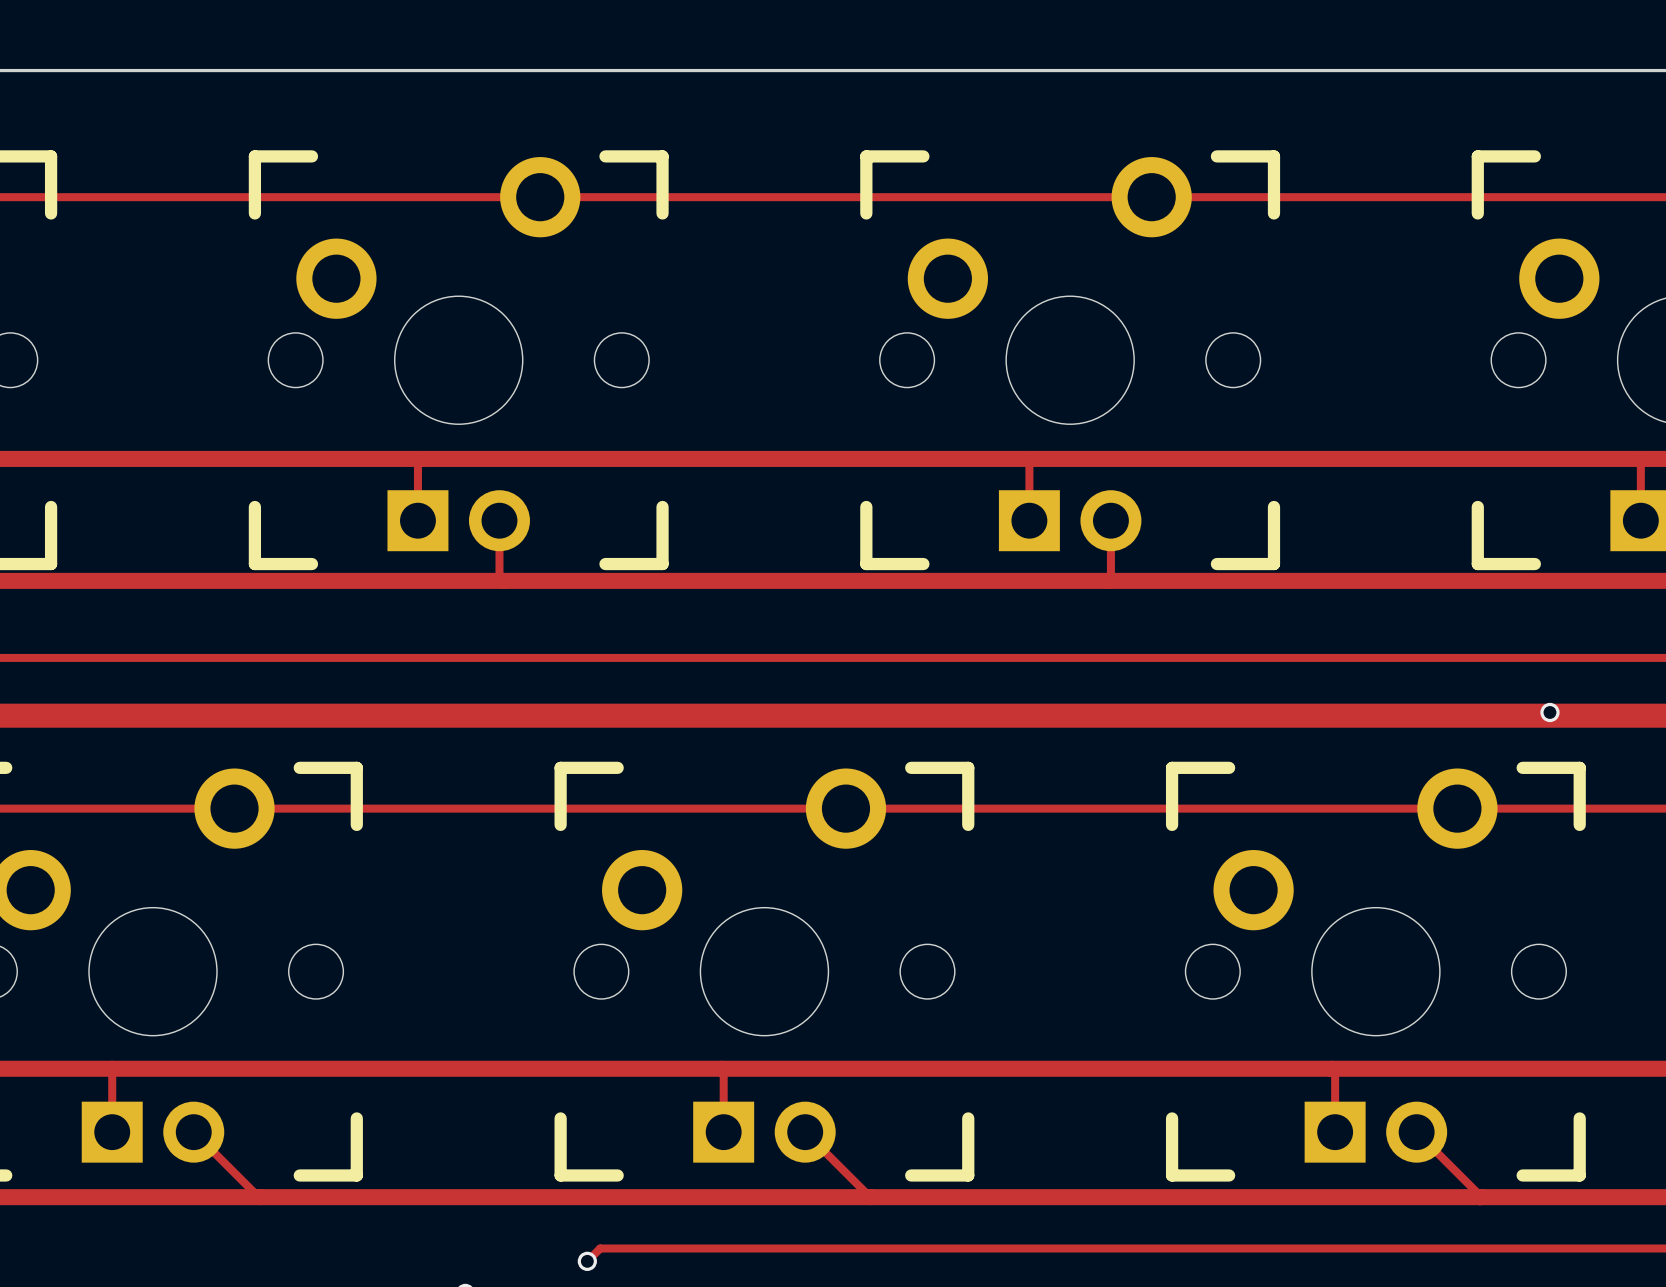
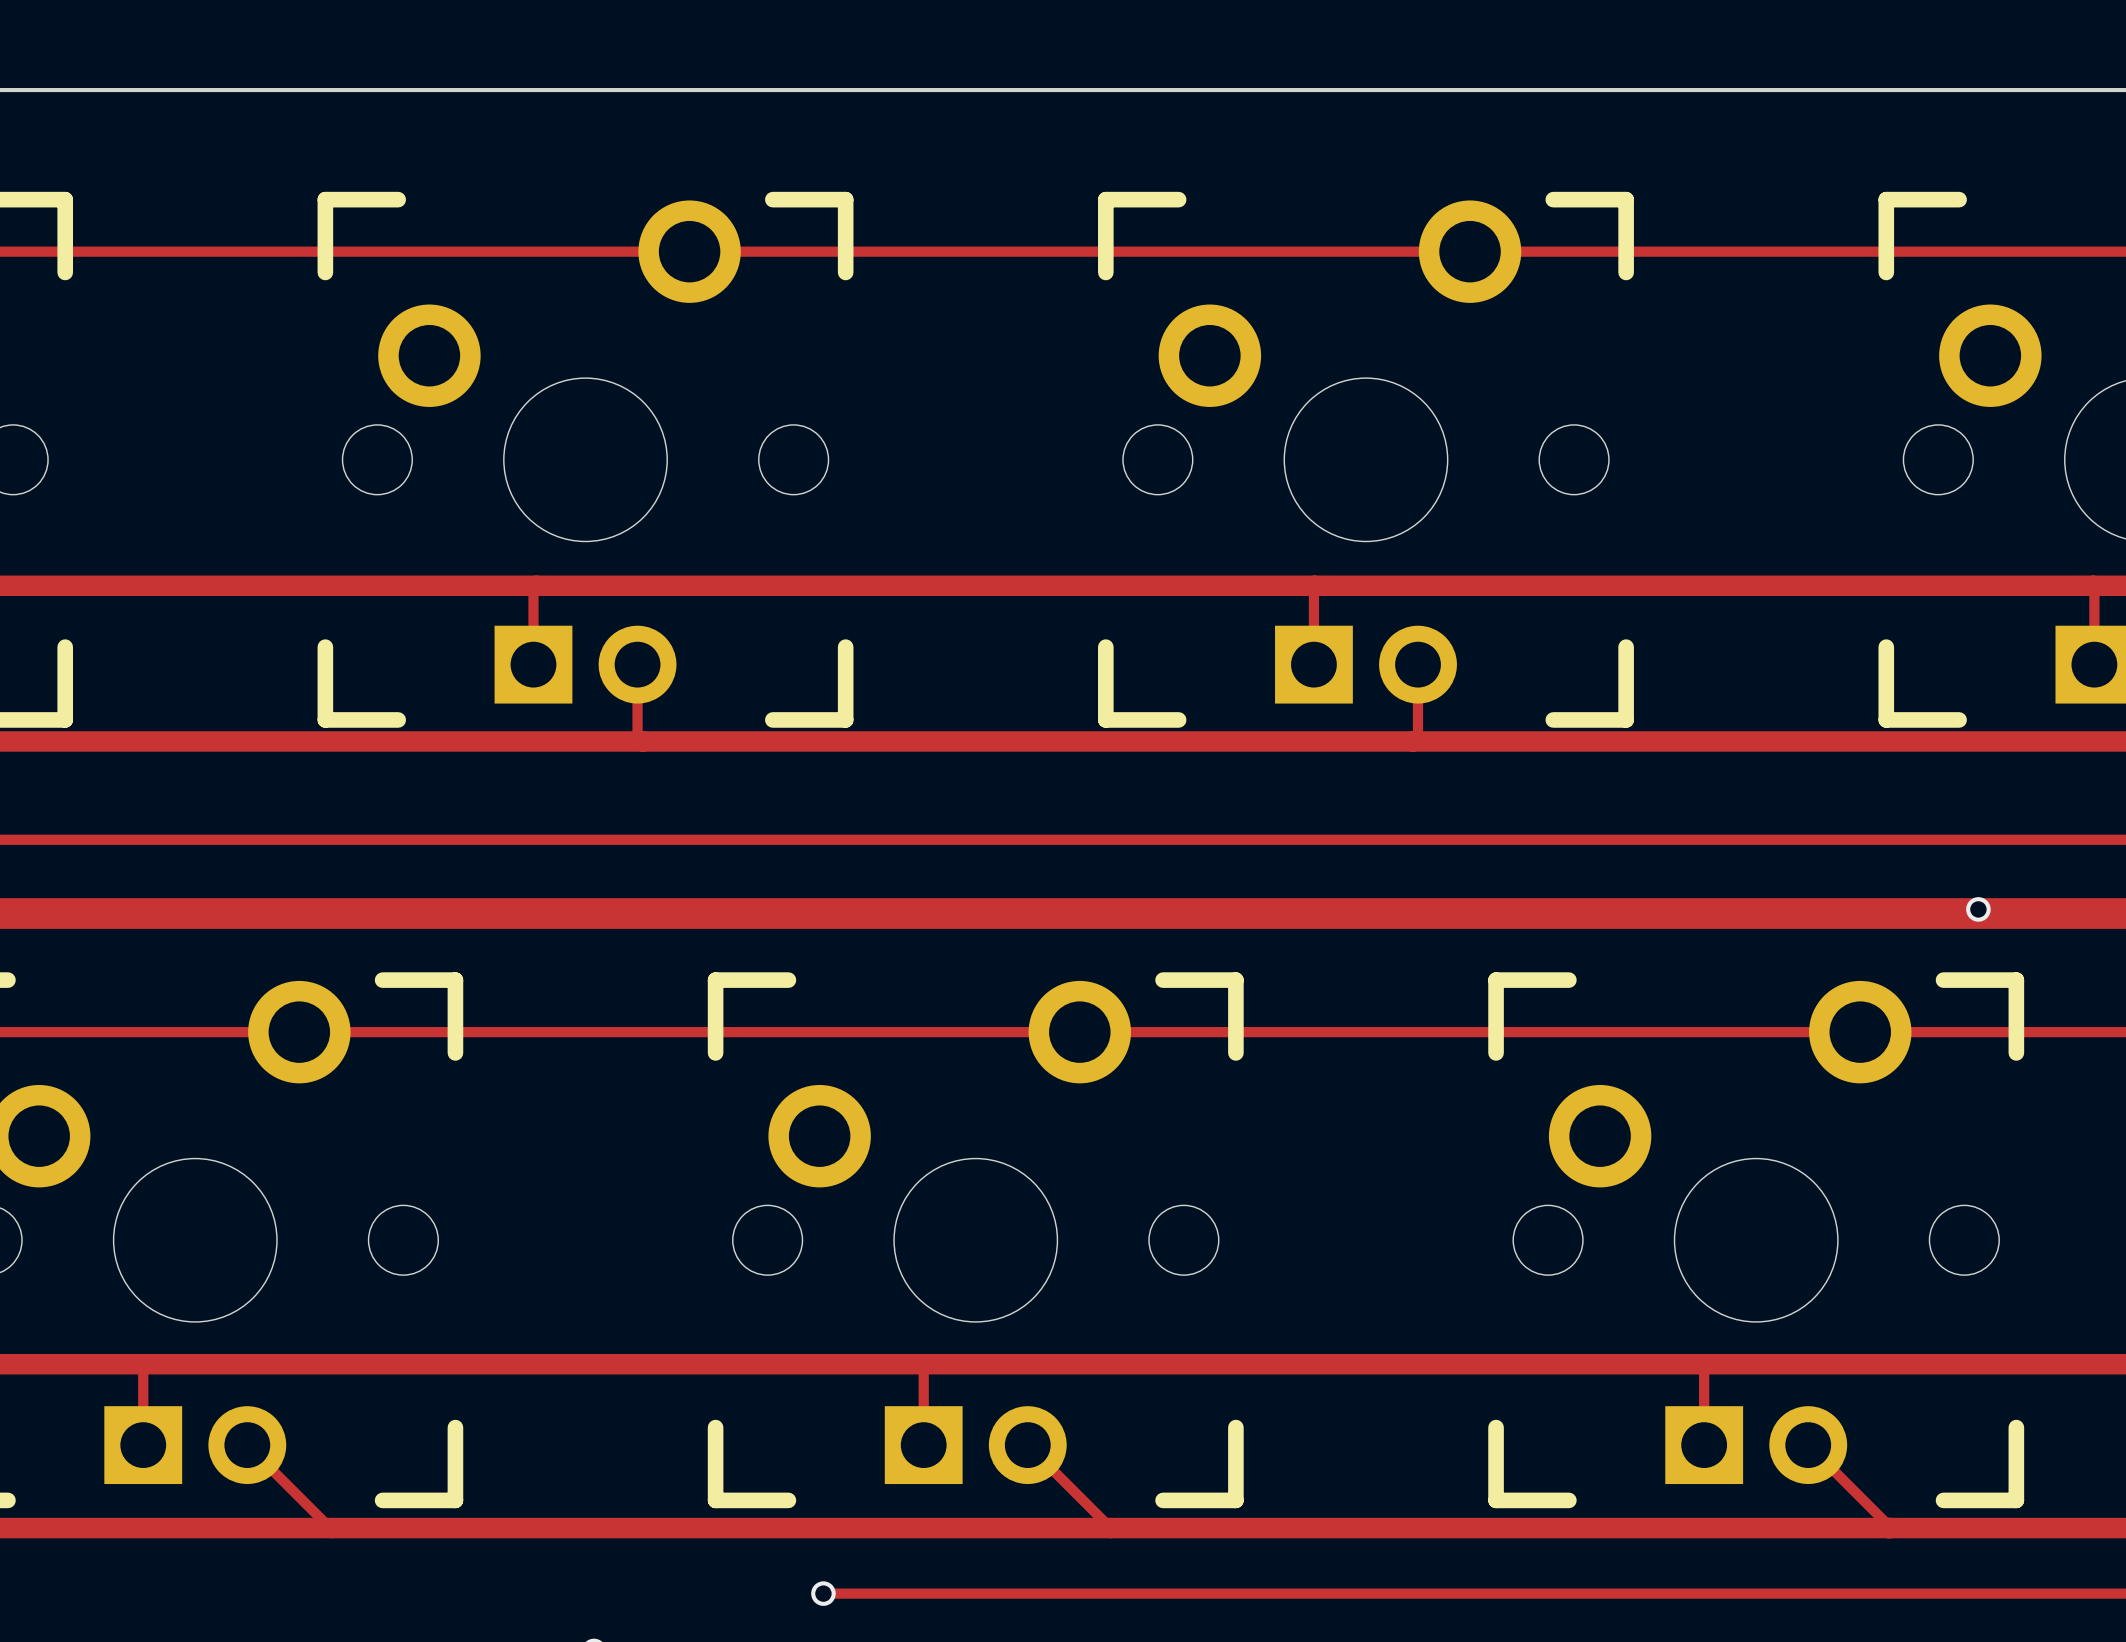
track: (645, 1248) (600, 1248) (587, 1261) -> none
via position: (587, 1261) -> (823, 1593)

